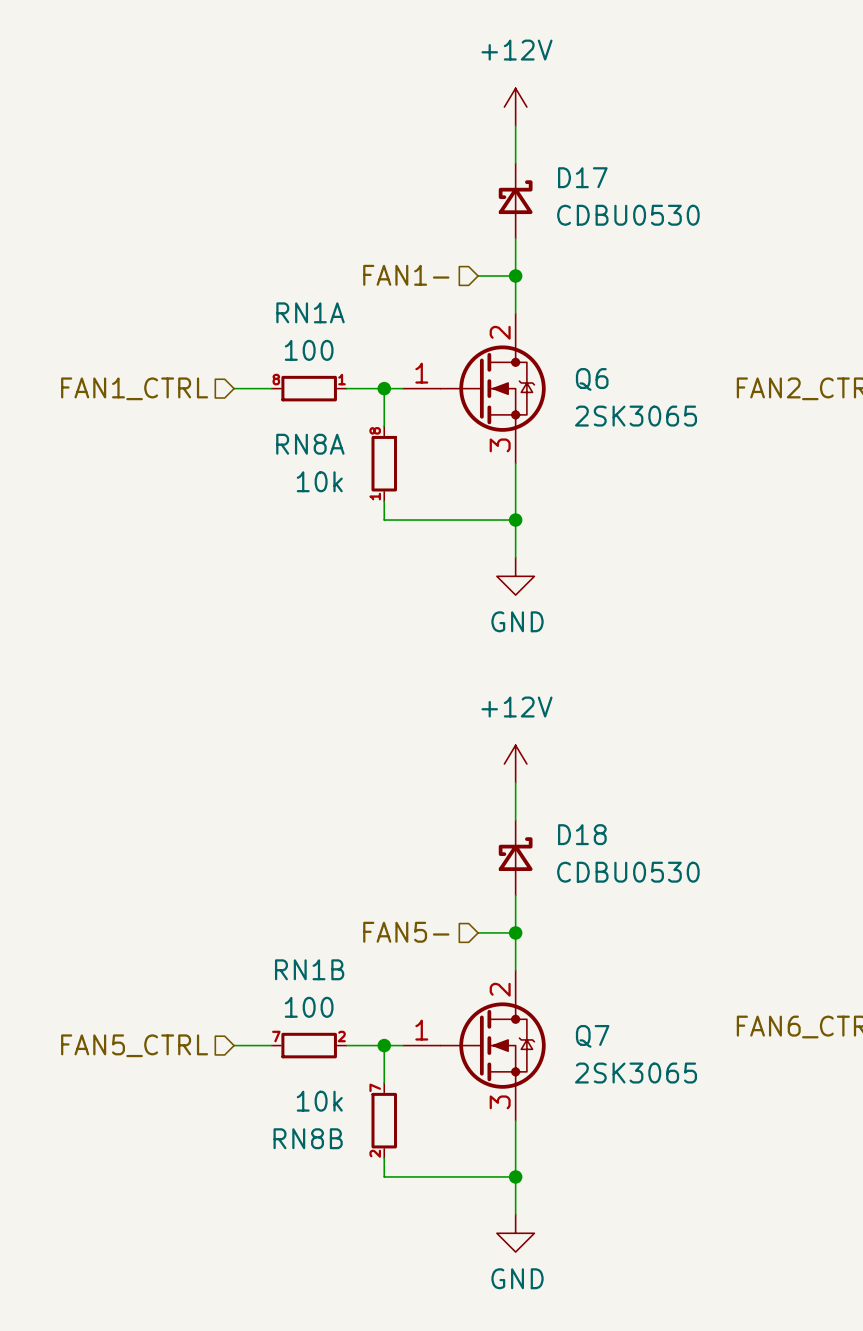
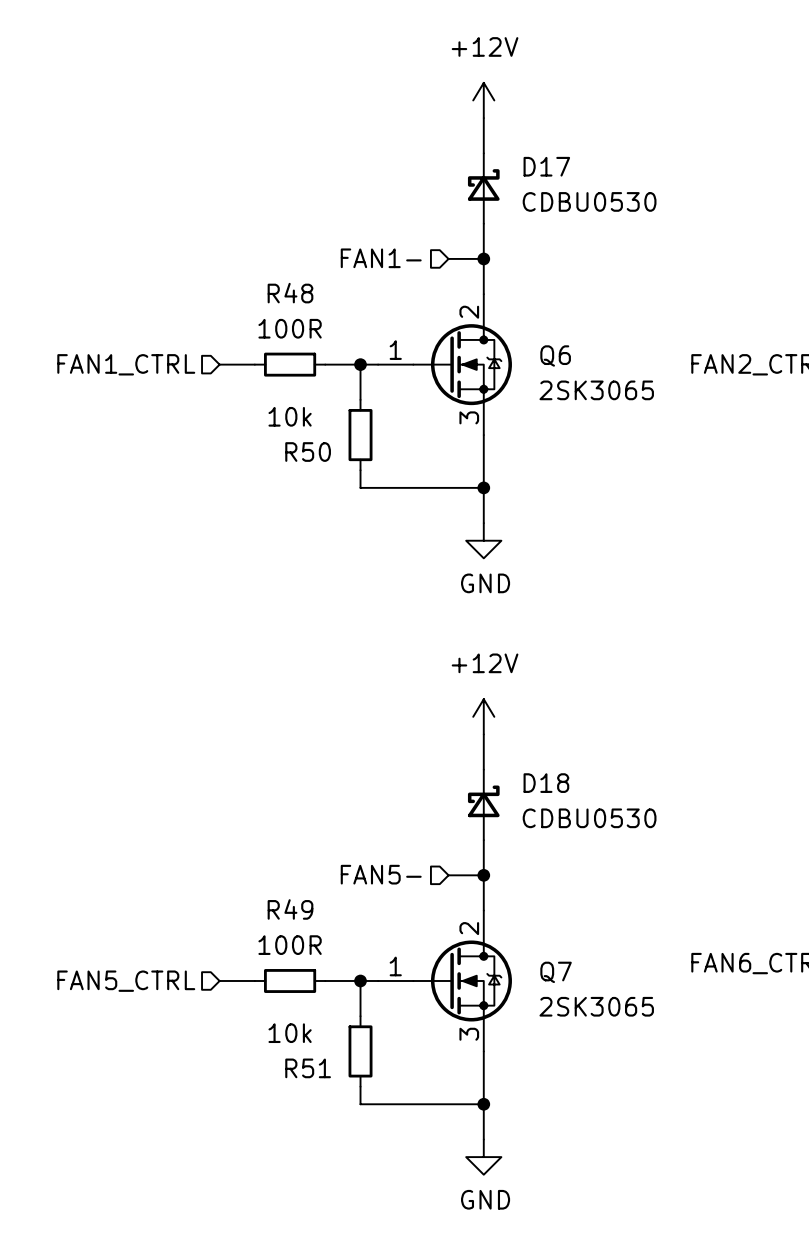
RN1A: 100 (309, 388) -> none
R48: none -> 100R (290, 364)
RN8A: 10k (384, 463) -> none
R50: none -> 10k (360, 435)
RN1B: 100 (309, 1045) -> none
R49: none -> 100R (290, 980)
RN8B: 10k (384, 1120) -> none
R51: none -> 10k (360, 1051)

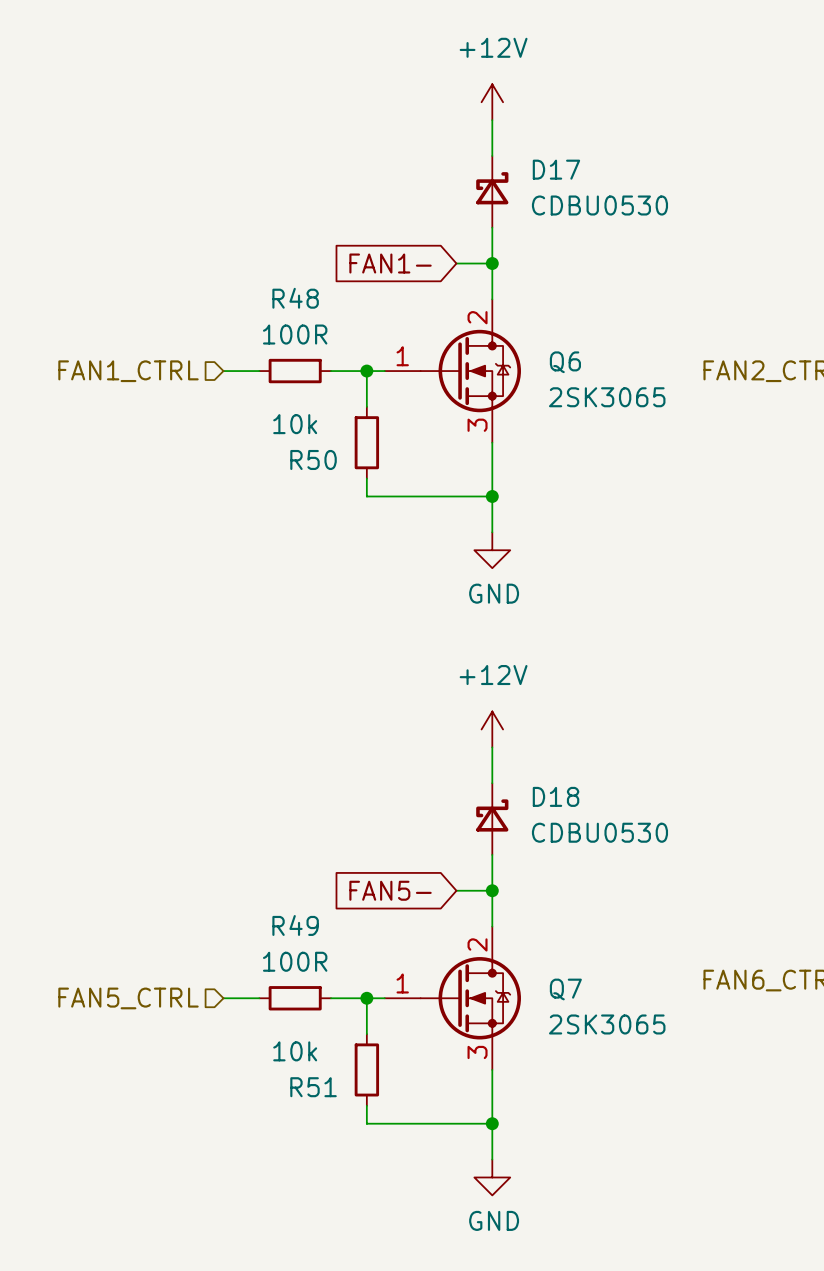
hierarchical label: FAN1- (381, 258) -> none
global label: none -> FAN1- (390, 263)
hierarchical label: FAN5- (381, 874) -> none
global label: none -> FAN5- (390, 890)

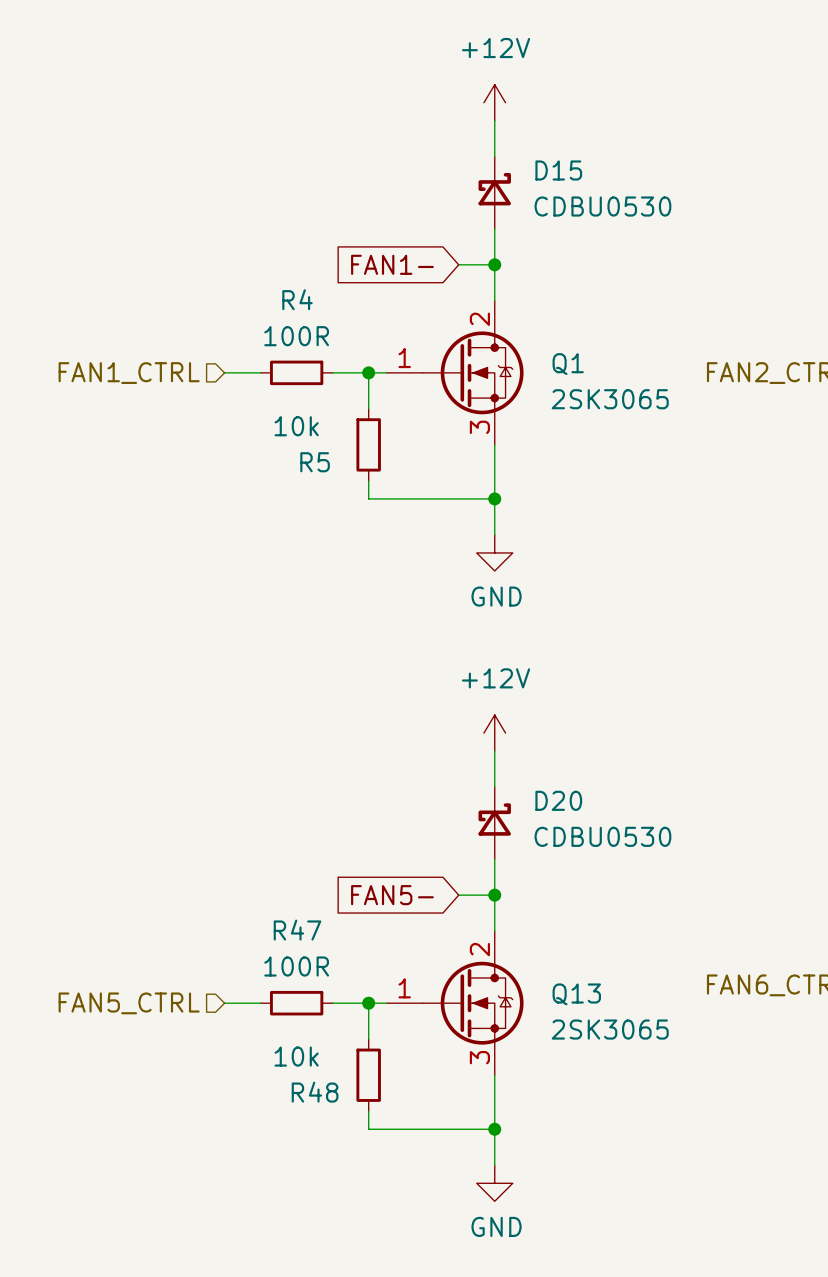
D17 name: D17 (556, 169) -> D15 (558, 170)
R48 name: R48 (295, 298) -> R4 (297, 299)
Q6 name: Q6 (565, 362) -> Q1 (568, 364)
R50 name: R50 (313, 459) -> R5 (315, 462)
D18 name: D18 (556, 796) -> D20 (558, 800)
R49 name: R49 (295, 925) -> R47 (297, 930)
Q7 name: Q7 (565, 989) -> Q13 (576, 994)
R51 name: R51 (313, 1087) -> R48 (315, 1092)

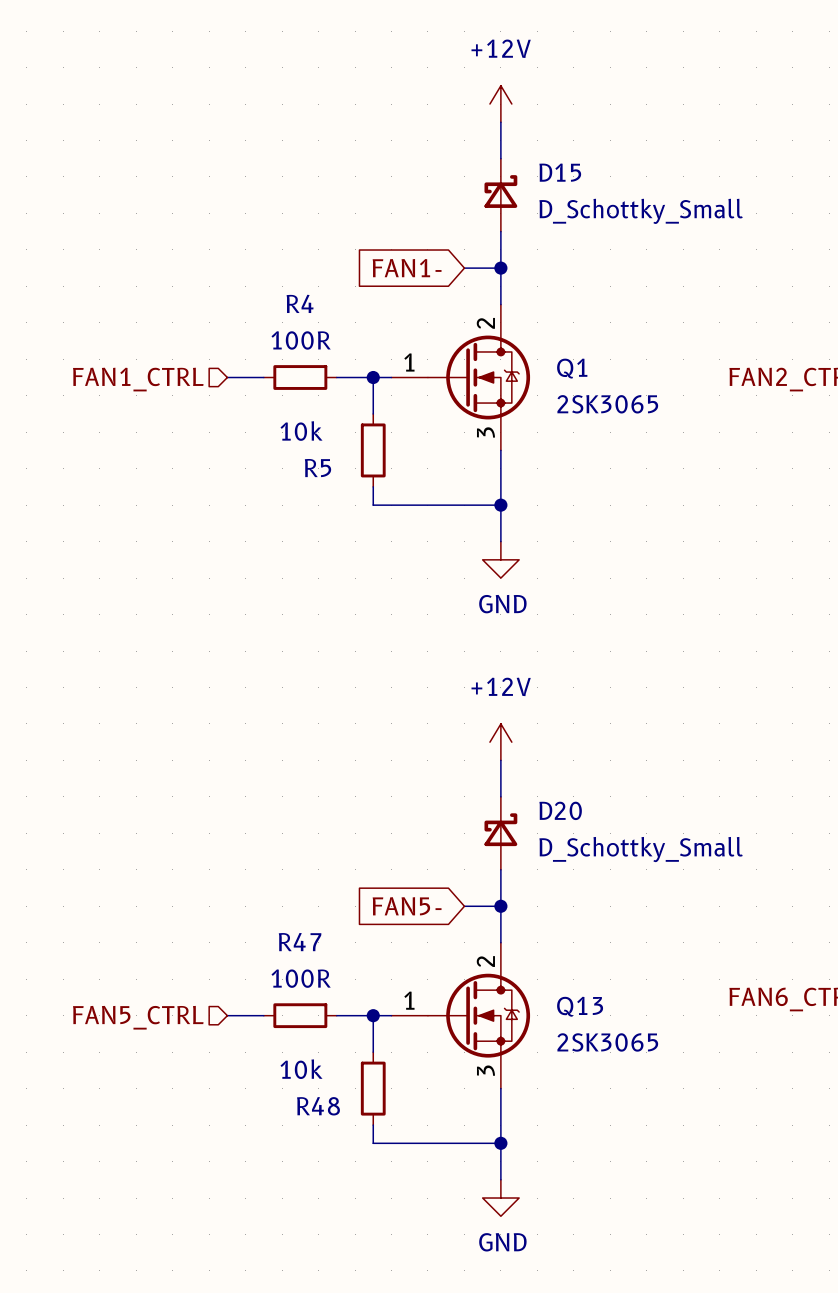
D15 value: CDBU0530 (602, 206) -> D_Schottky_Small (641, 211)
D20 value: CDBU0530 (602, 836) -> D_Schottky_Small (641, 849)

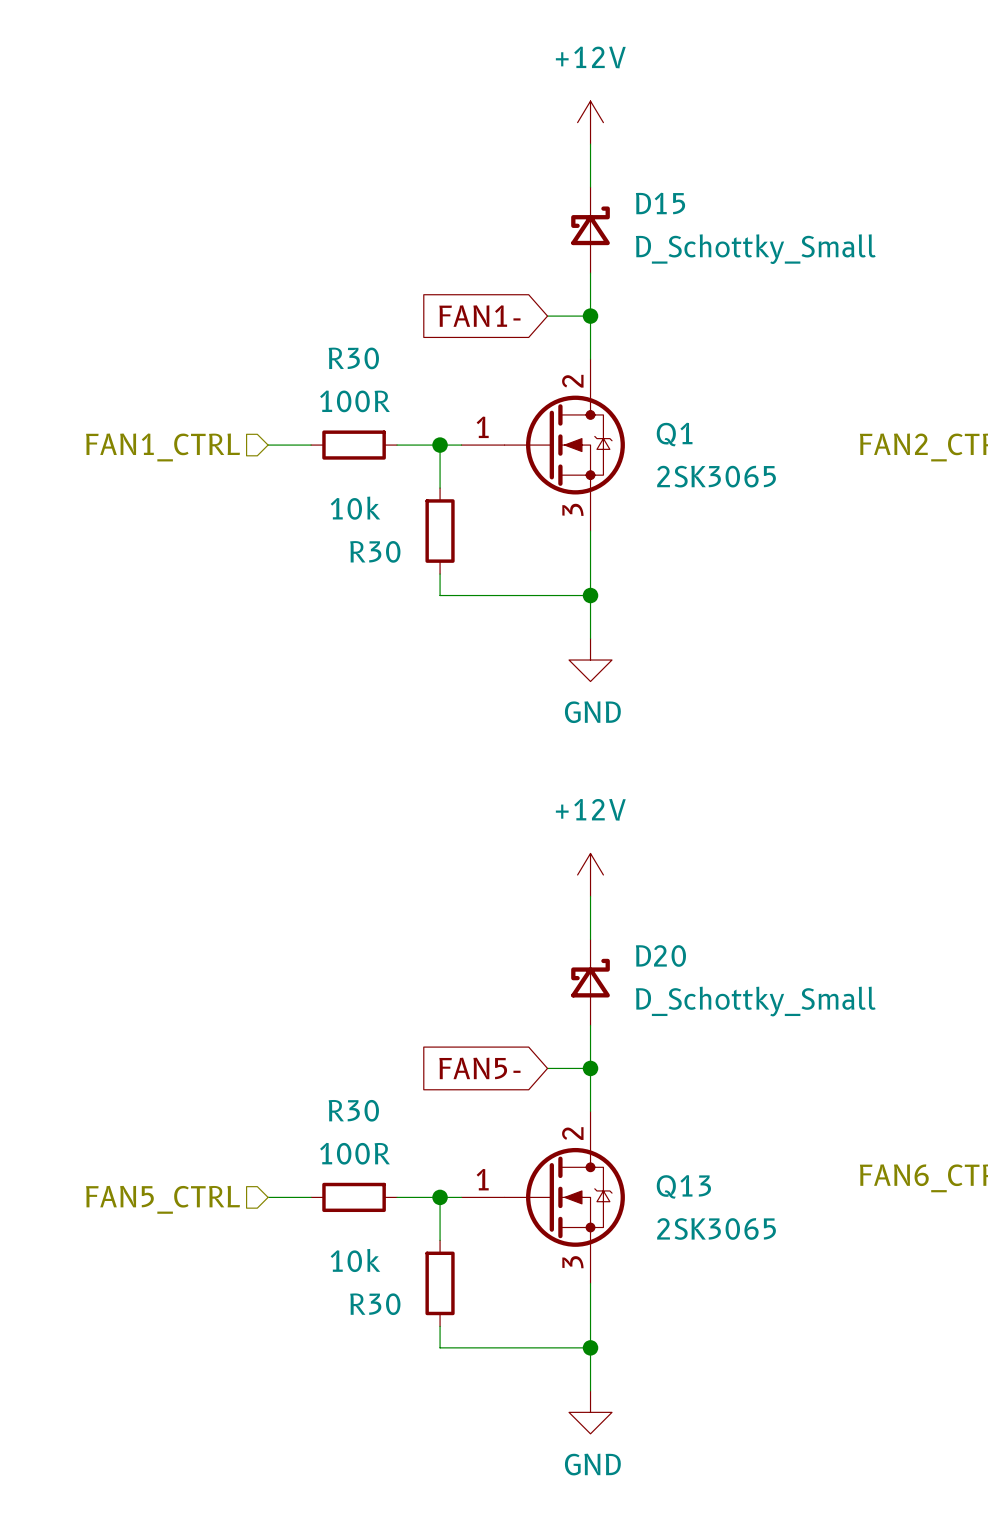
R4 name: R4 (300, 303) -> R30 (353, 358)
R5 name: R5 (317, 468) -> R30 (375, 551)
R47 name: R47 (300, 942) -> R30 (353, 1110)
R48 name: R48 (318, 1106) -> R30 (375, 1304)

